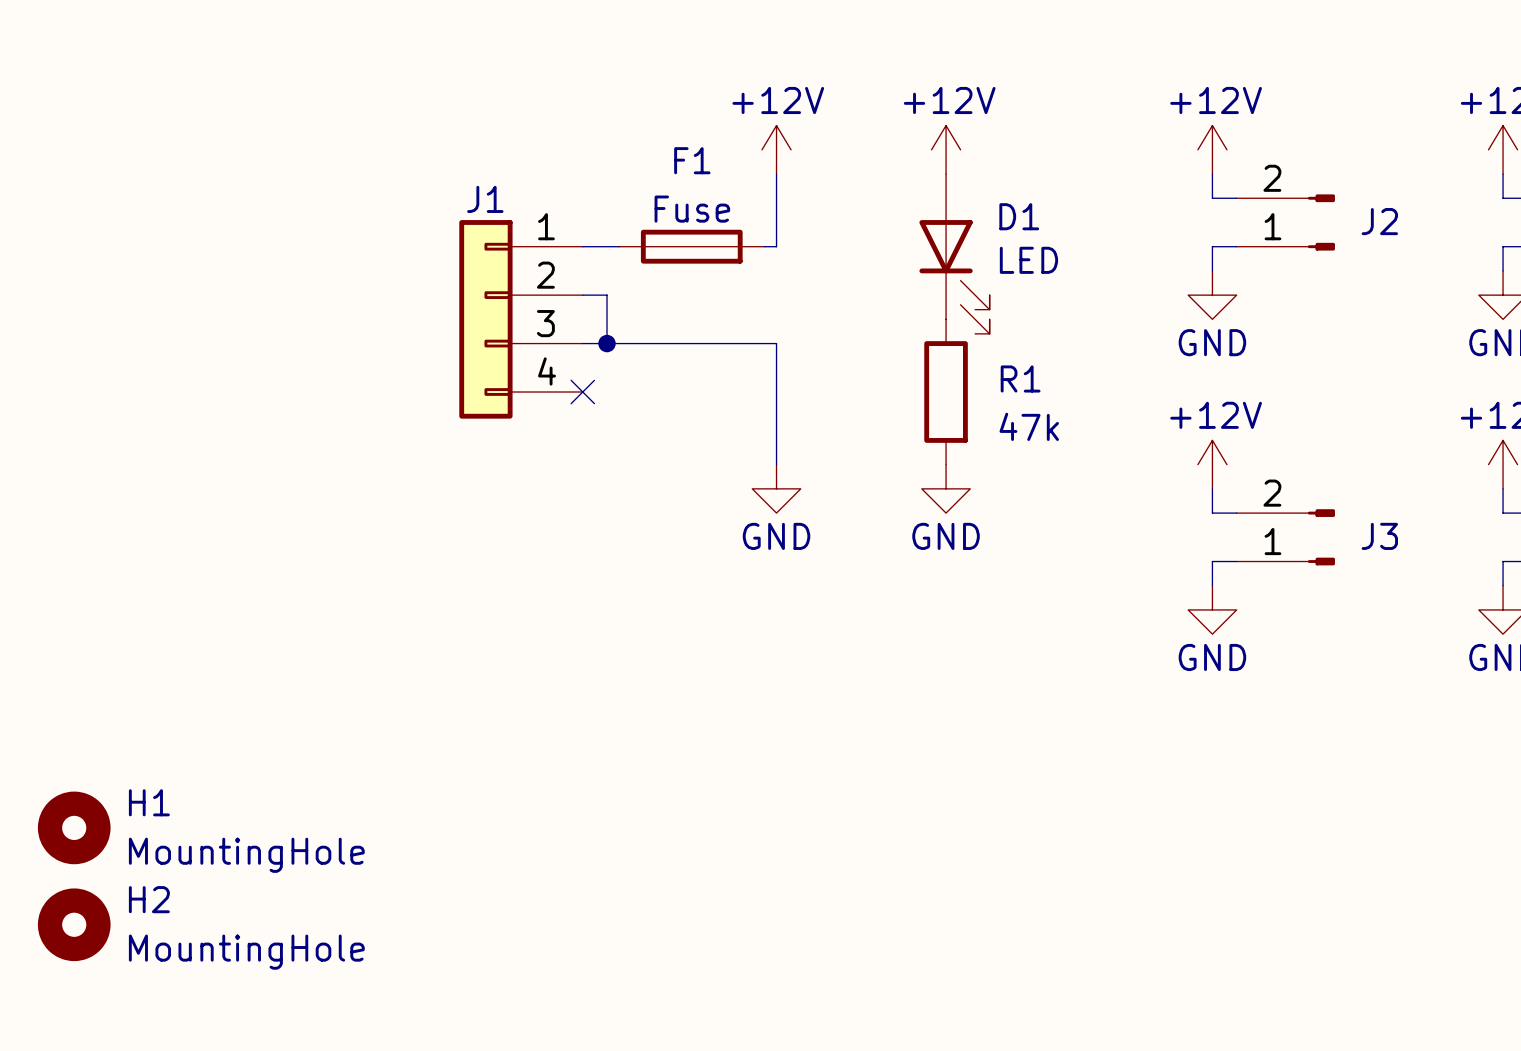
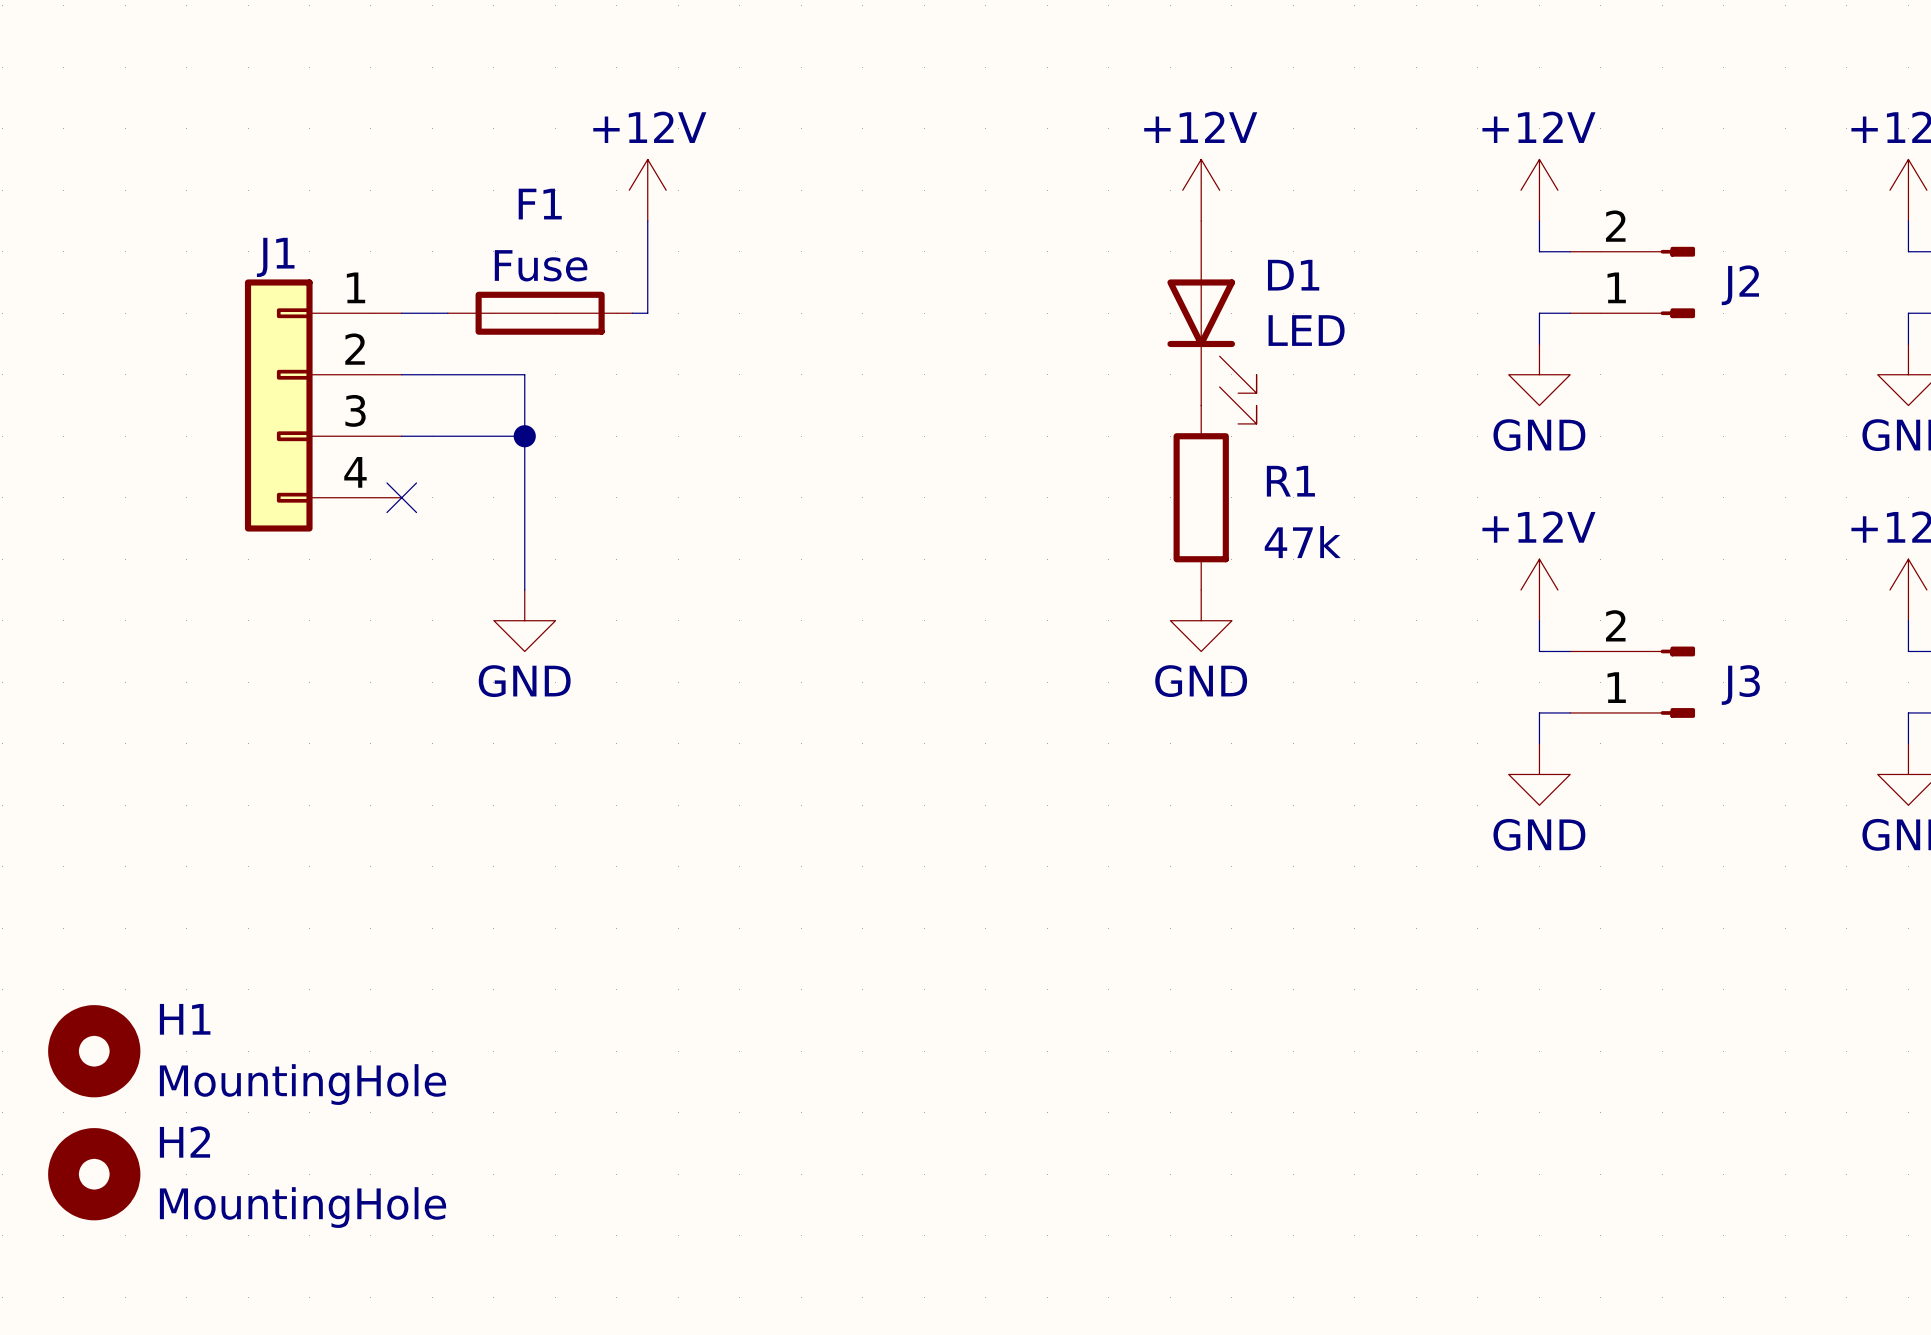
power symbol position: +12V (776, 149) -> +12V (647, 190)
wire: (776, 174) (776, 246) (764, 246) -> (647, 220) (647, 313) (632, 313)
wire: (582, 246) (619, 246) -> (401, 313) (447, 313)
F1 position: (691, 246) -> (540, 313)
wire: none -> (401, 374) (524, 374) (524, 589)
wire: (582, 295) (607, 295) (607, 343) -> none
J1 position: (521, 319) -> (323, 405)
wire: none -> (401, 436) (524, 436)
junction: none -> (524, 436)
wire: (582, 343) (776, 343) (776, 464) -> none
junction: (607, 343) -> none
no-connect mark: none -> (401, 497)
no-connect mark: (582, 392) -> none
power symbol position: GND (776, 488) -> GND (524, 620)

